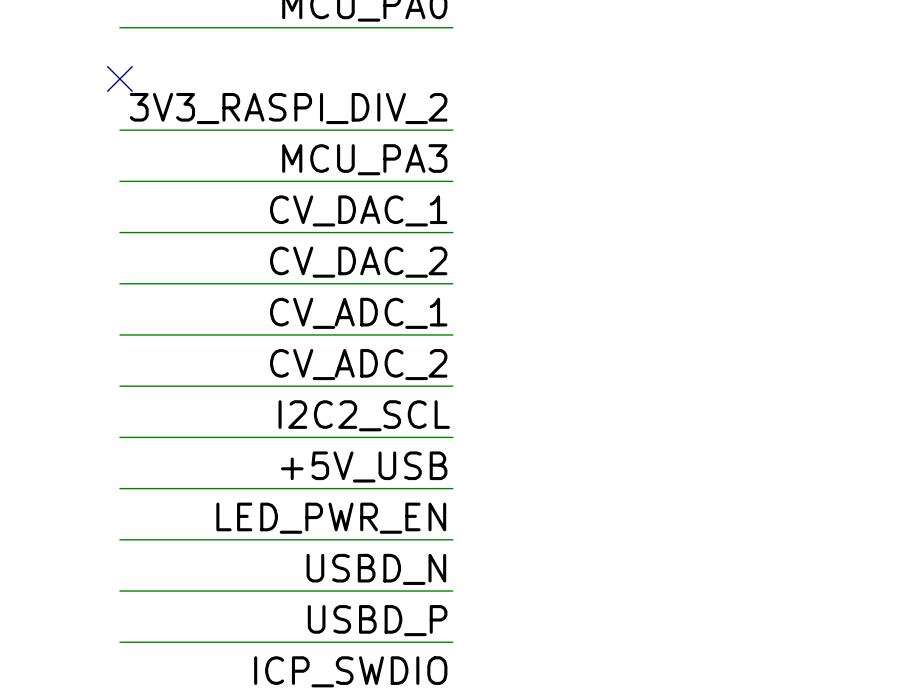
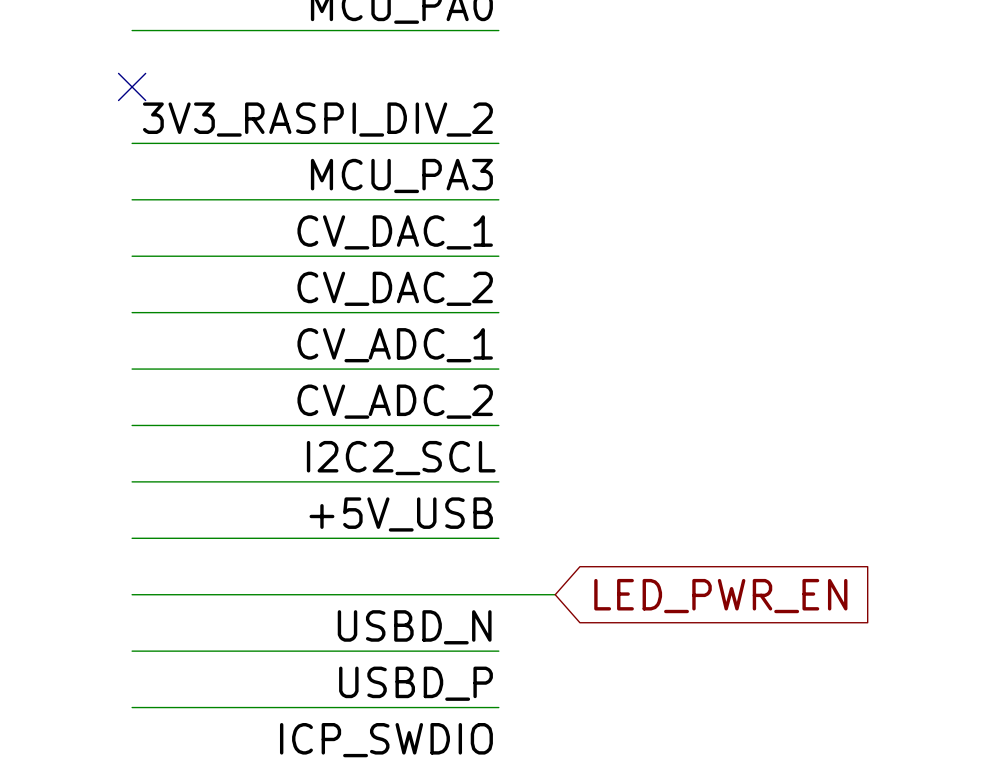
label: LED_PWR_EN (331, 518) -> none
wire: none -> (498, 594) (555, 594)
global label: none -> LED_PWR_EN (720, 596)

